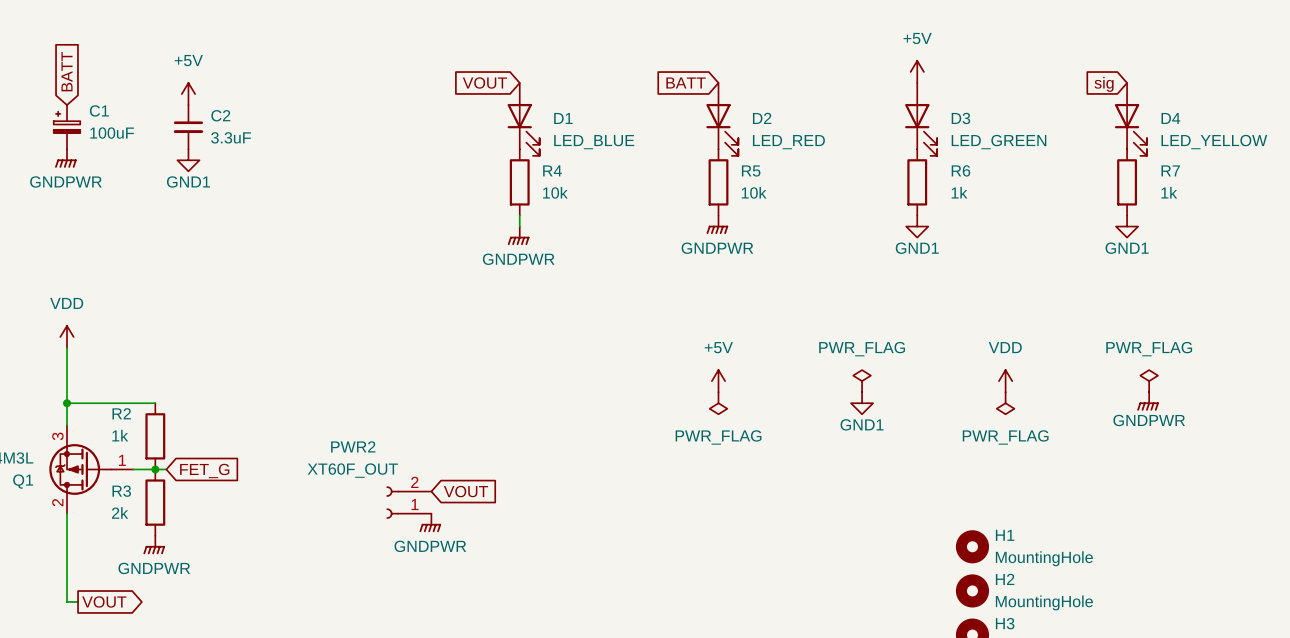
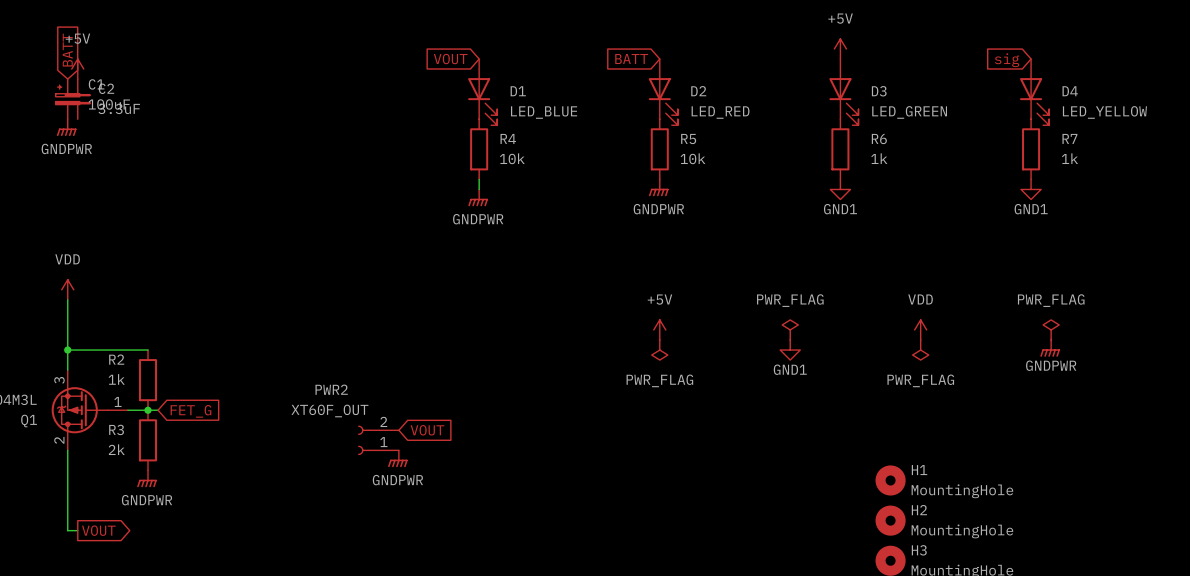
power symbol: none -> +5V (77, 69)
power symbol: +5V (188, 94) -> none
C2 position: (188, 127) -> (77, 99)
power symbol: GND1 (188, 160) -> none

